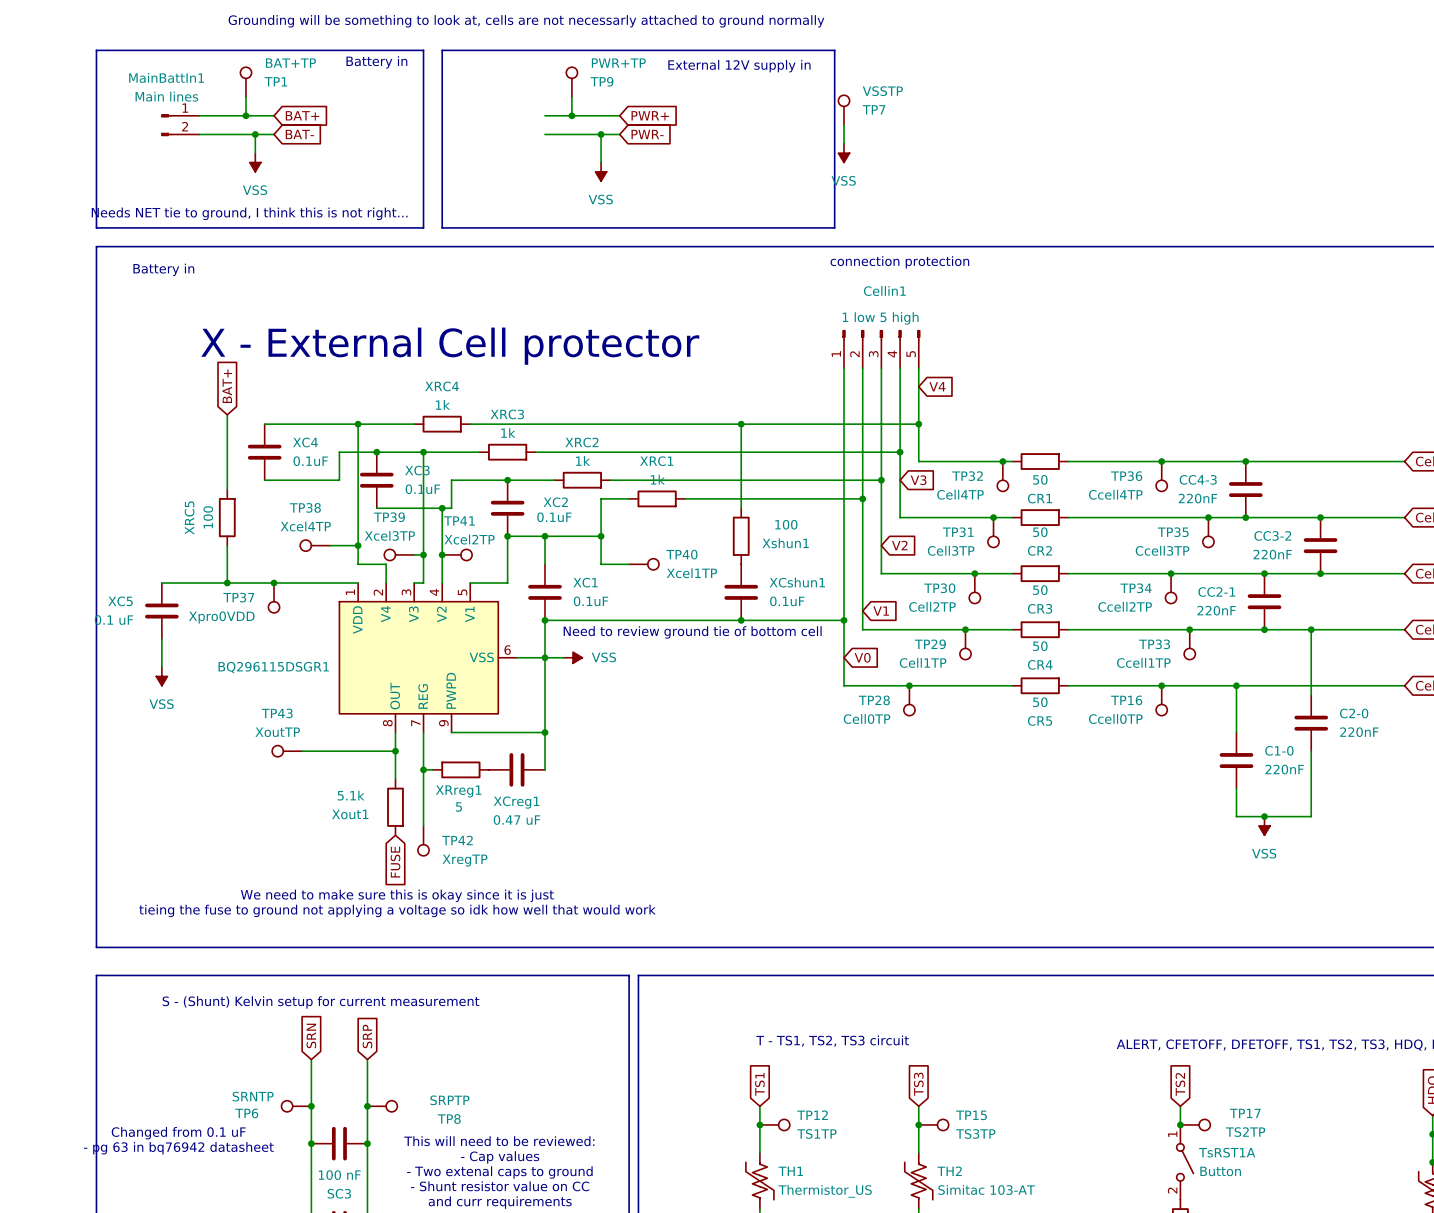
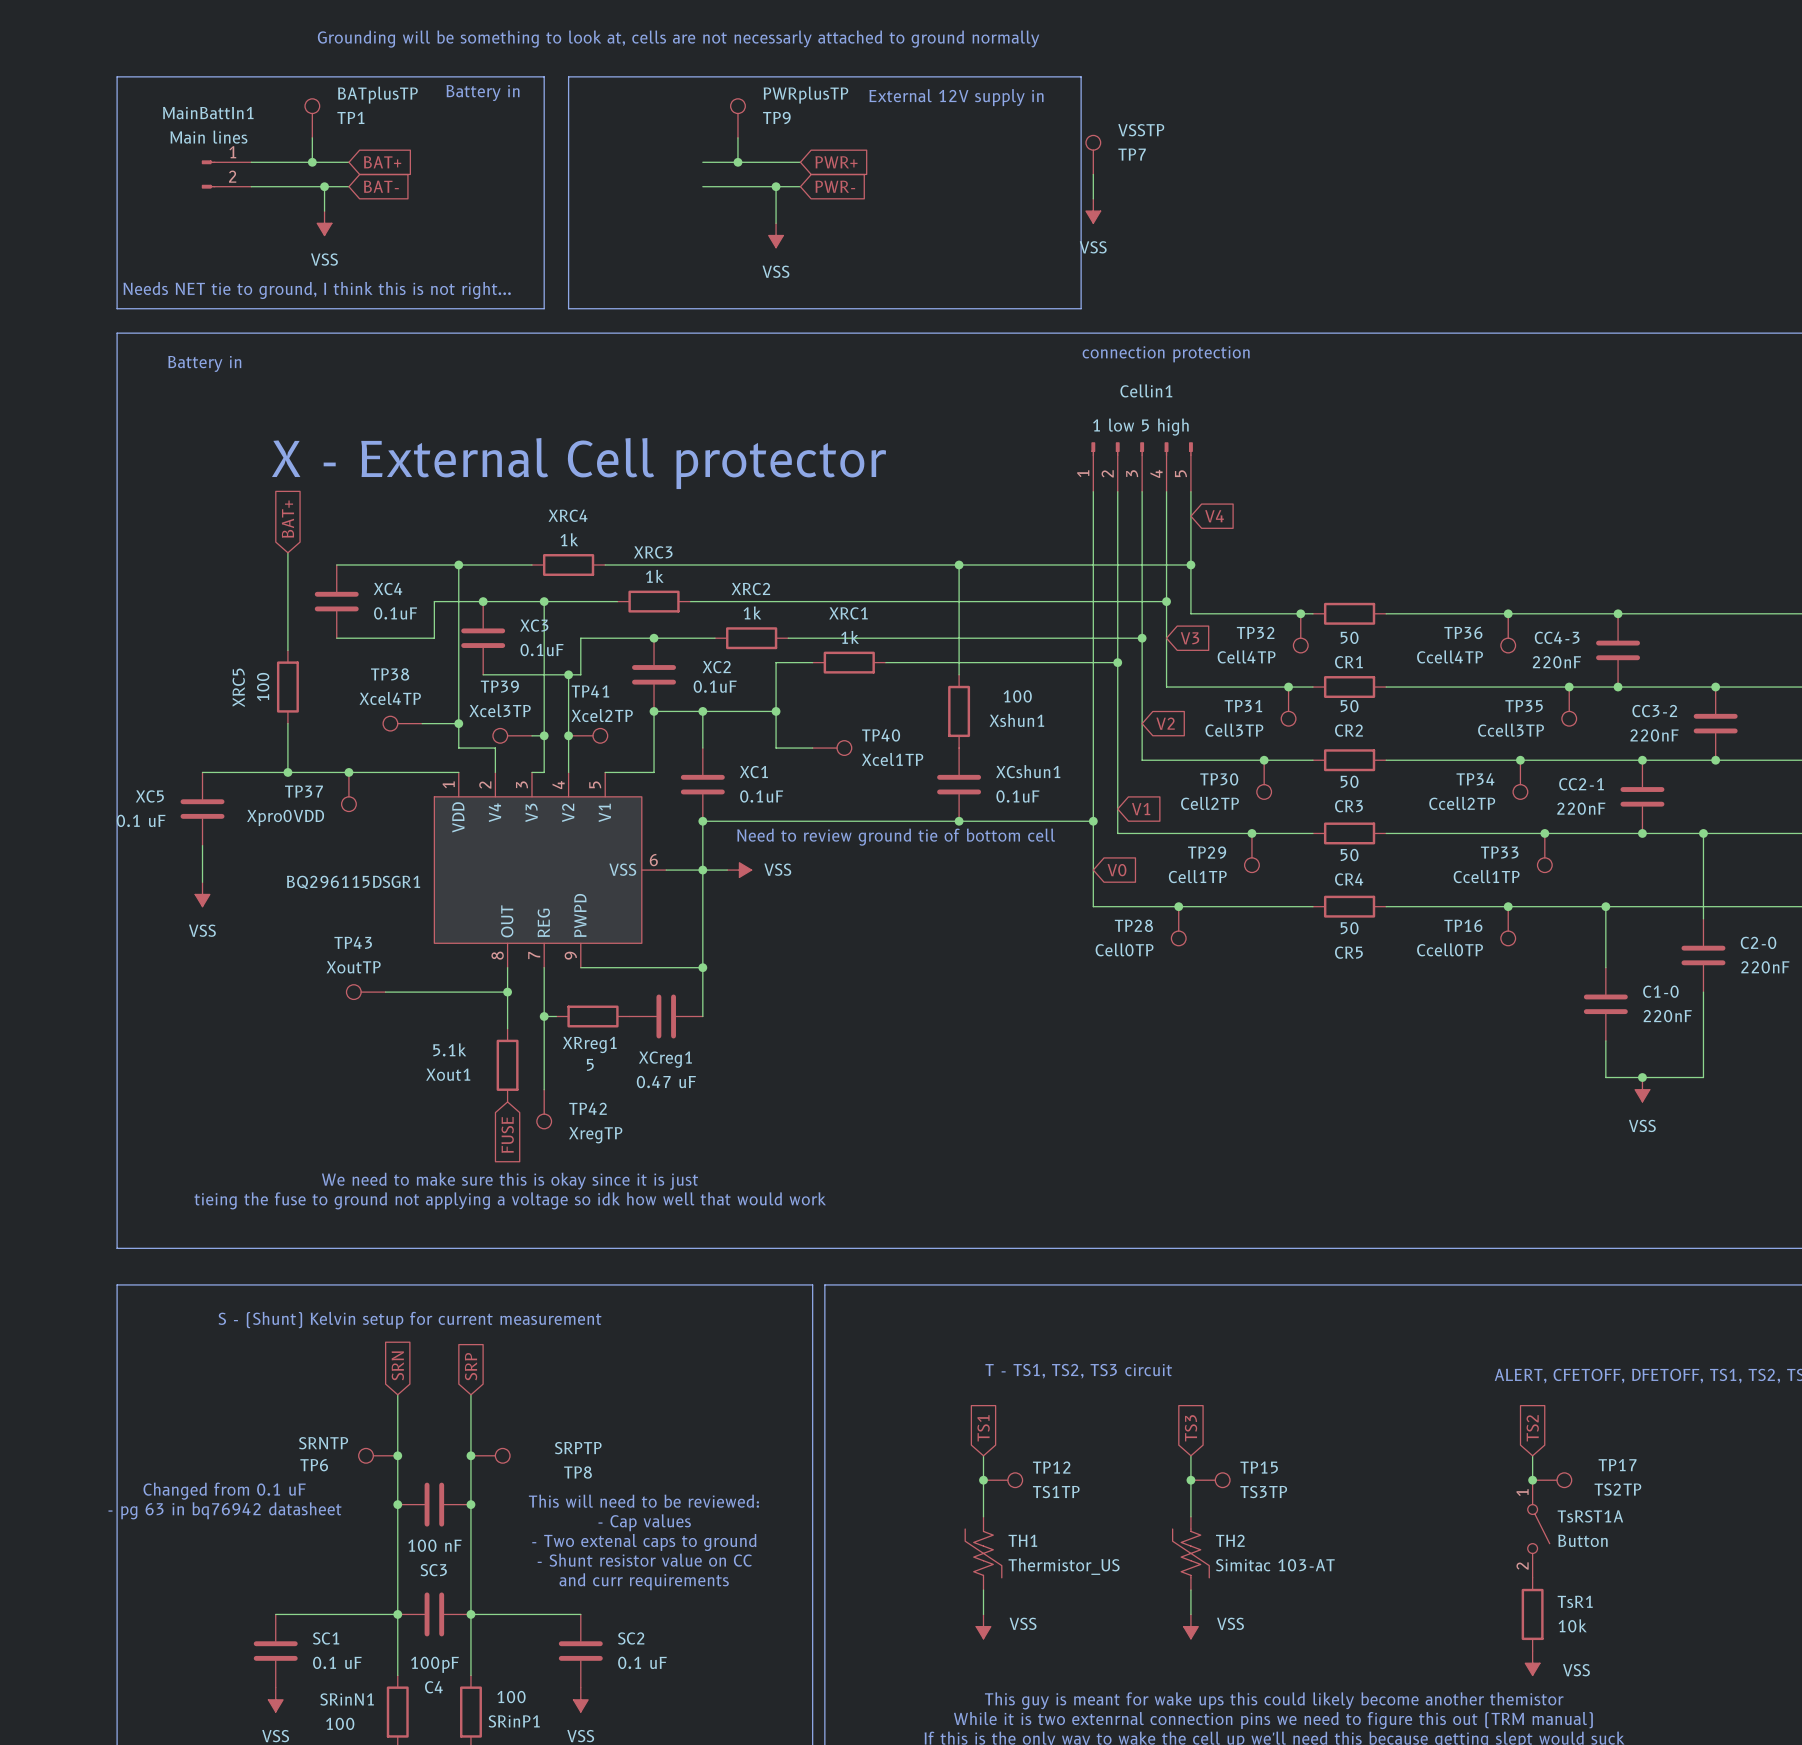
TP1 value: BAT+TP (290, 63) -> BATplusTP (377, 95)
TP9 value: PWR+TP (618, 63) -> PWRplusTP (805, 95)

